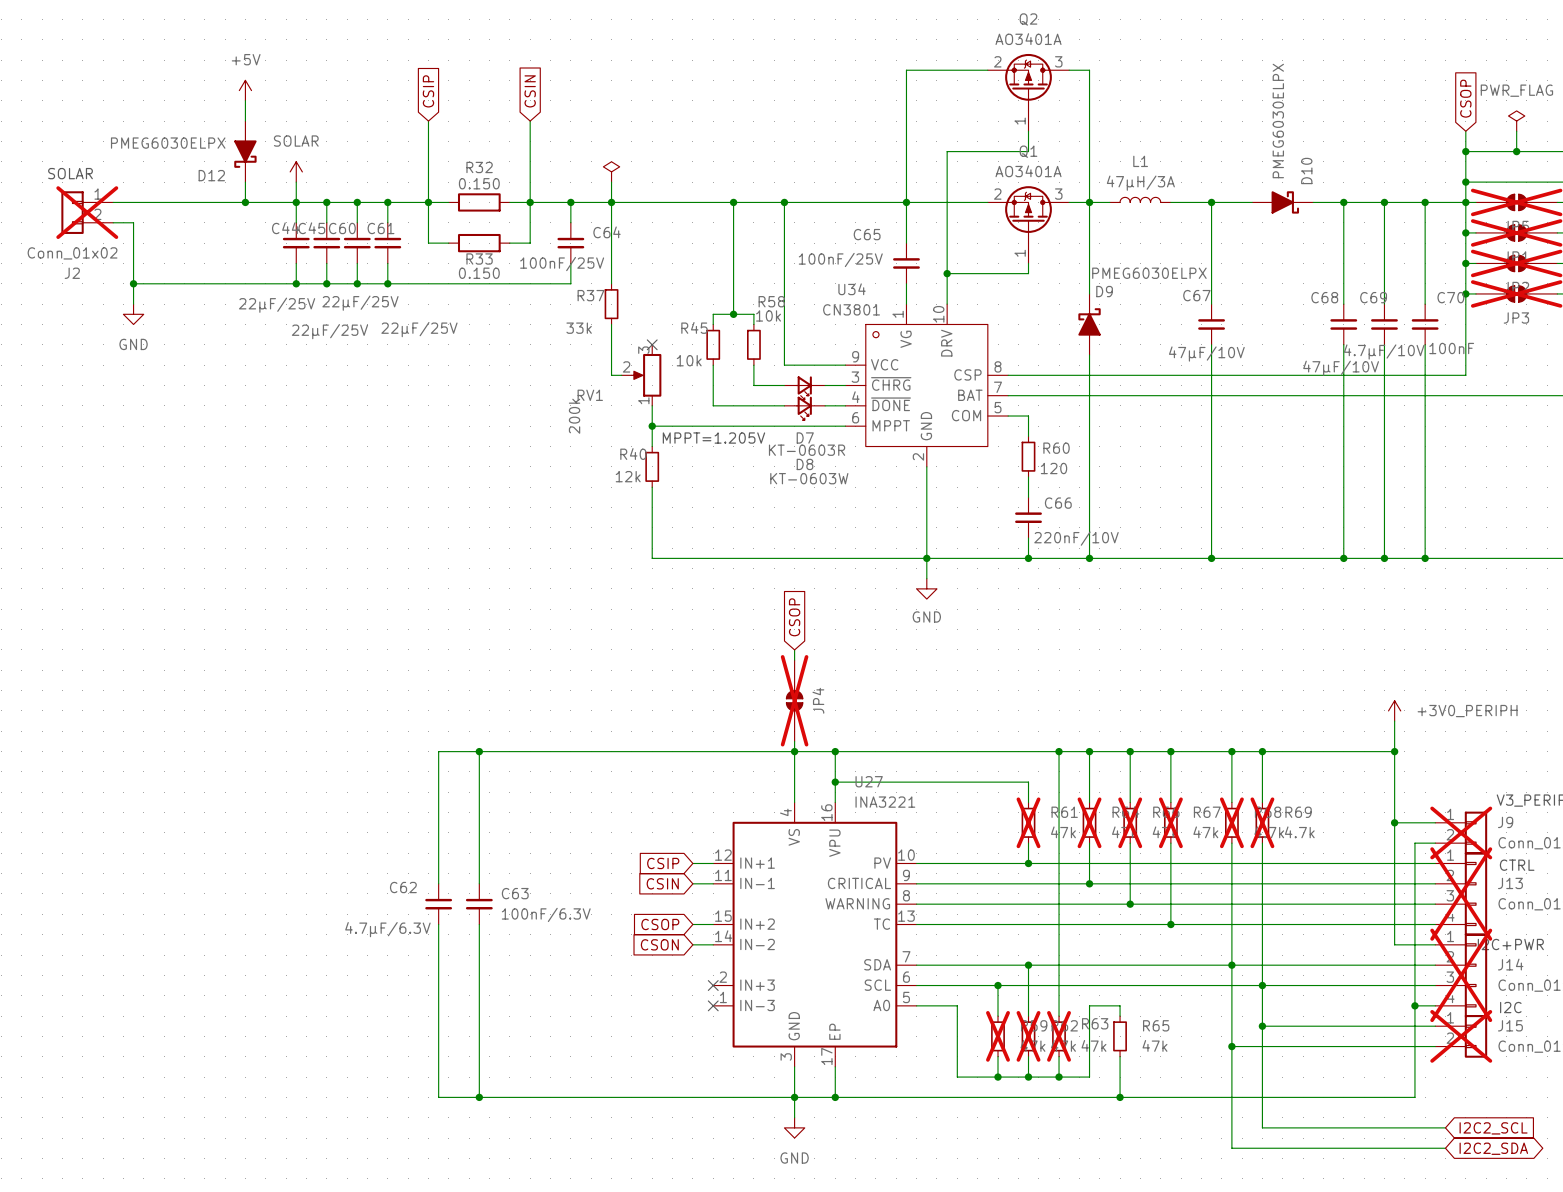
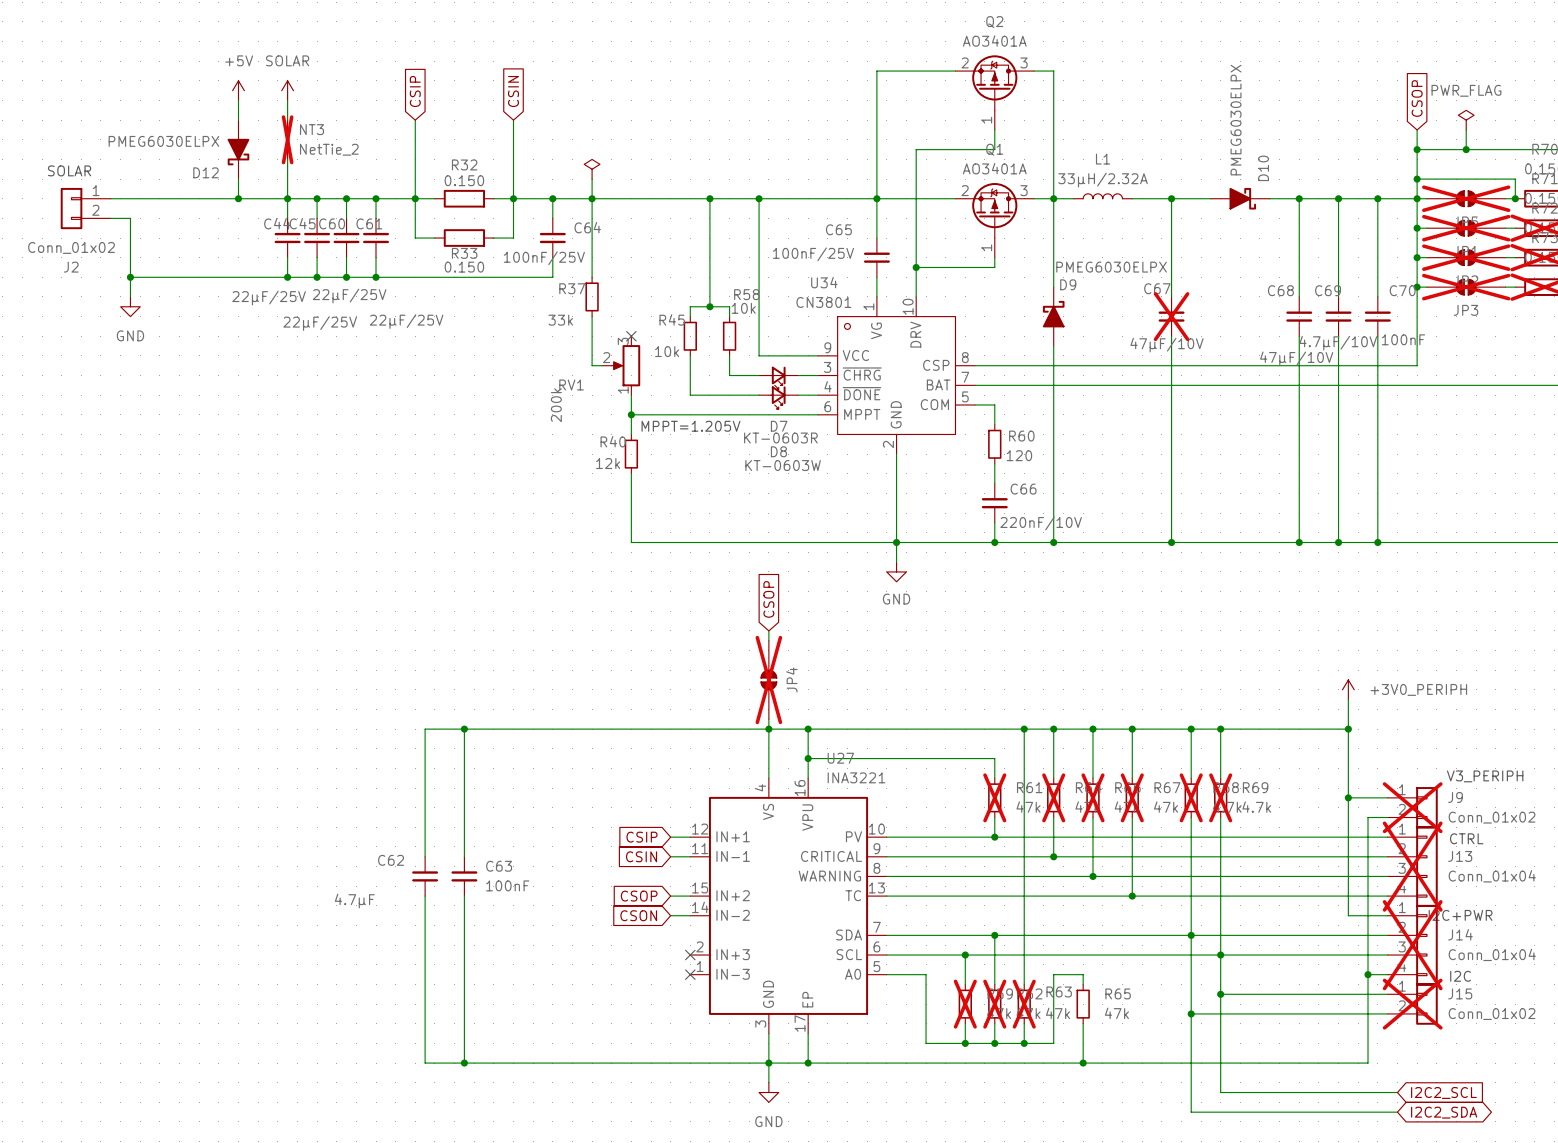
wire: none -> (287, 100) (287, 120)
NT3: none -> NetTie_2 (287, 139)
power symbol position: SOLAR (296, 171) -> SOLAR (287, 90)
L1 value: 47µH/3A (1140, 183) -> 33µH/2.32A (1103, 180)
J2 do-not-place cross: (87, 212) -> none
C67 do-not-place cross: none -> (1171, 316)
C63 value: 100nF/6.3V (546, 914) -> 100nF (507, 885)
C62 value: 4.7µF/6.3V (387, 929) -> 4.7µF (354, 901)

